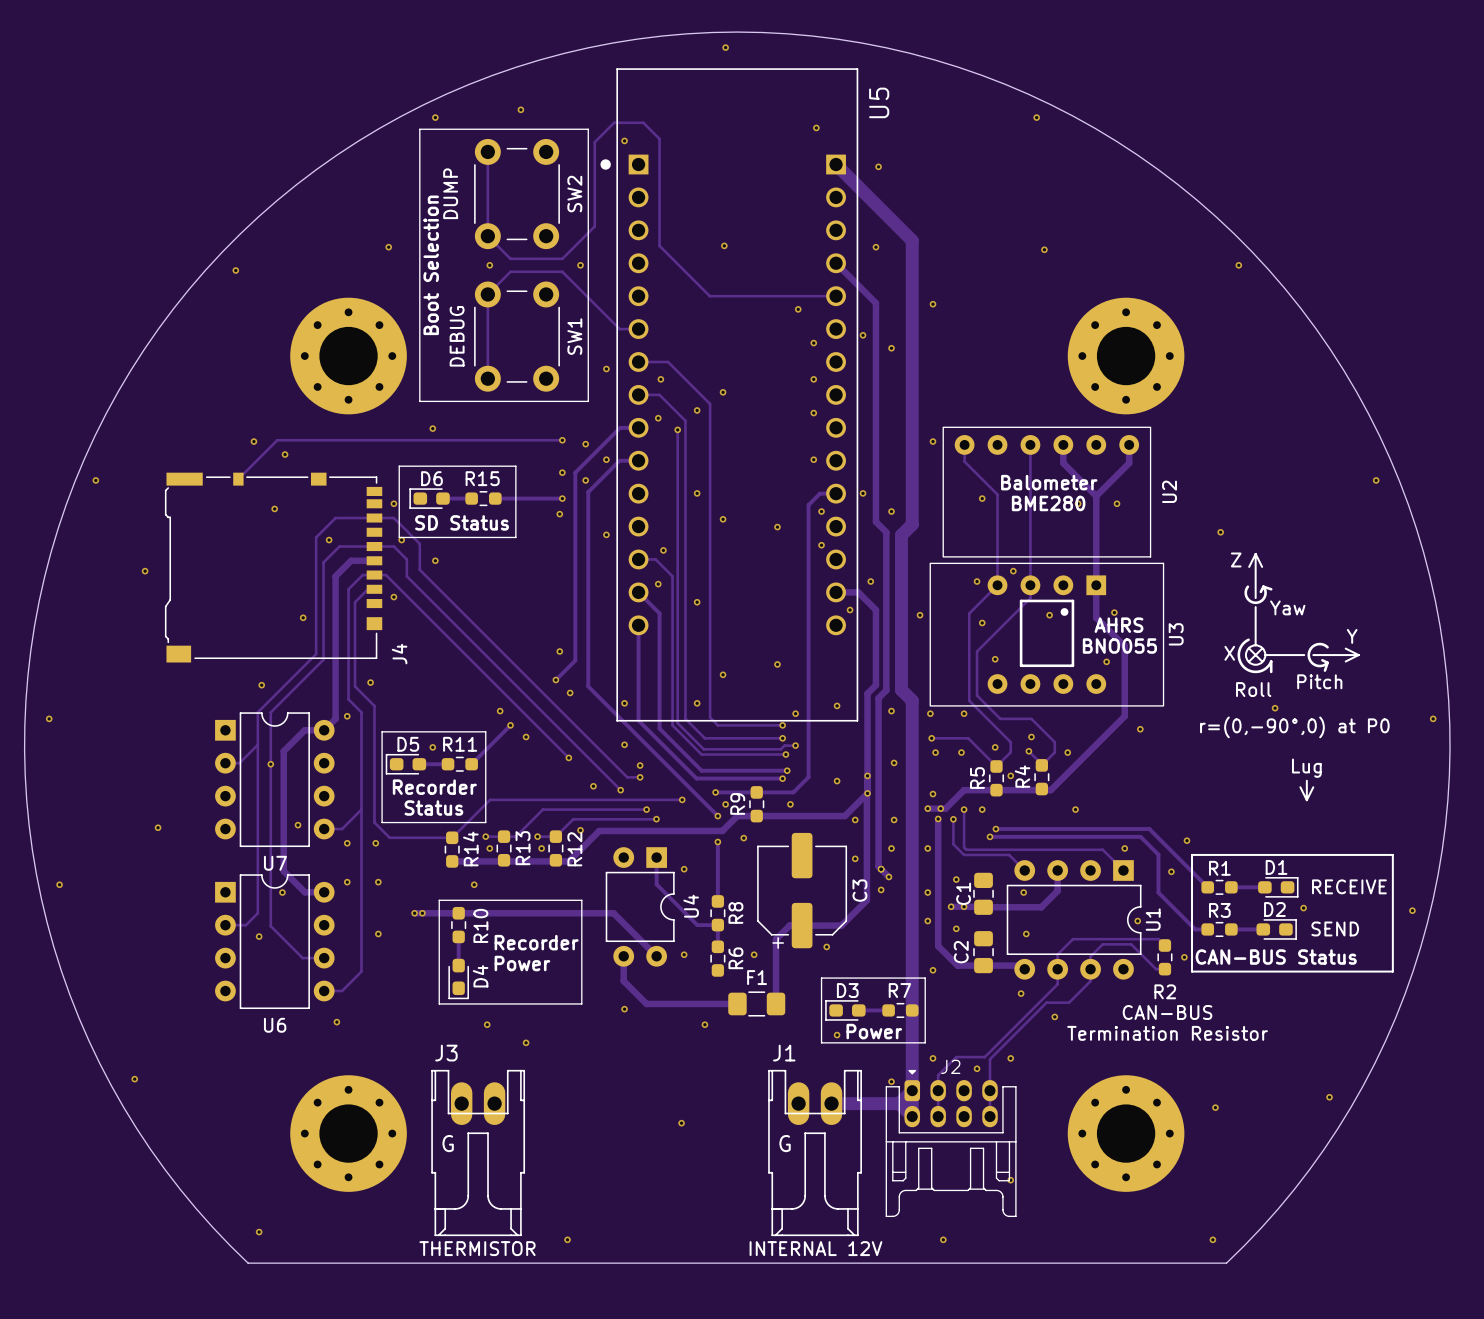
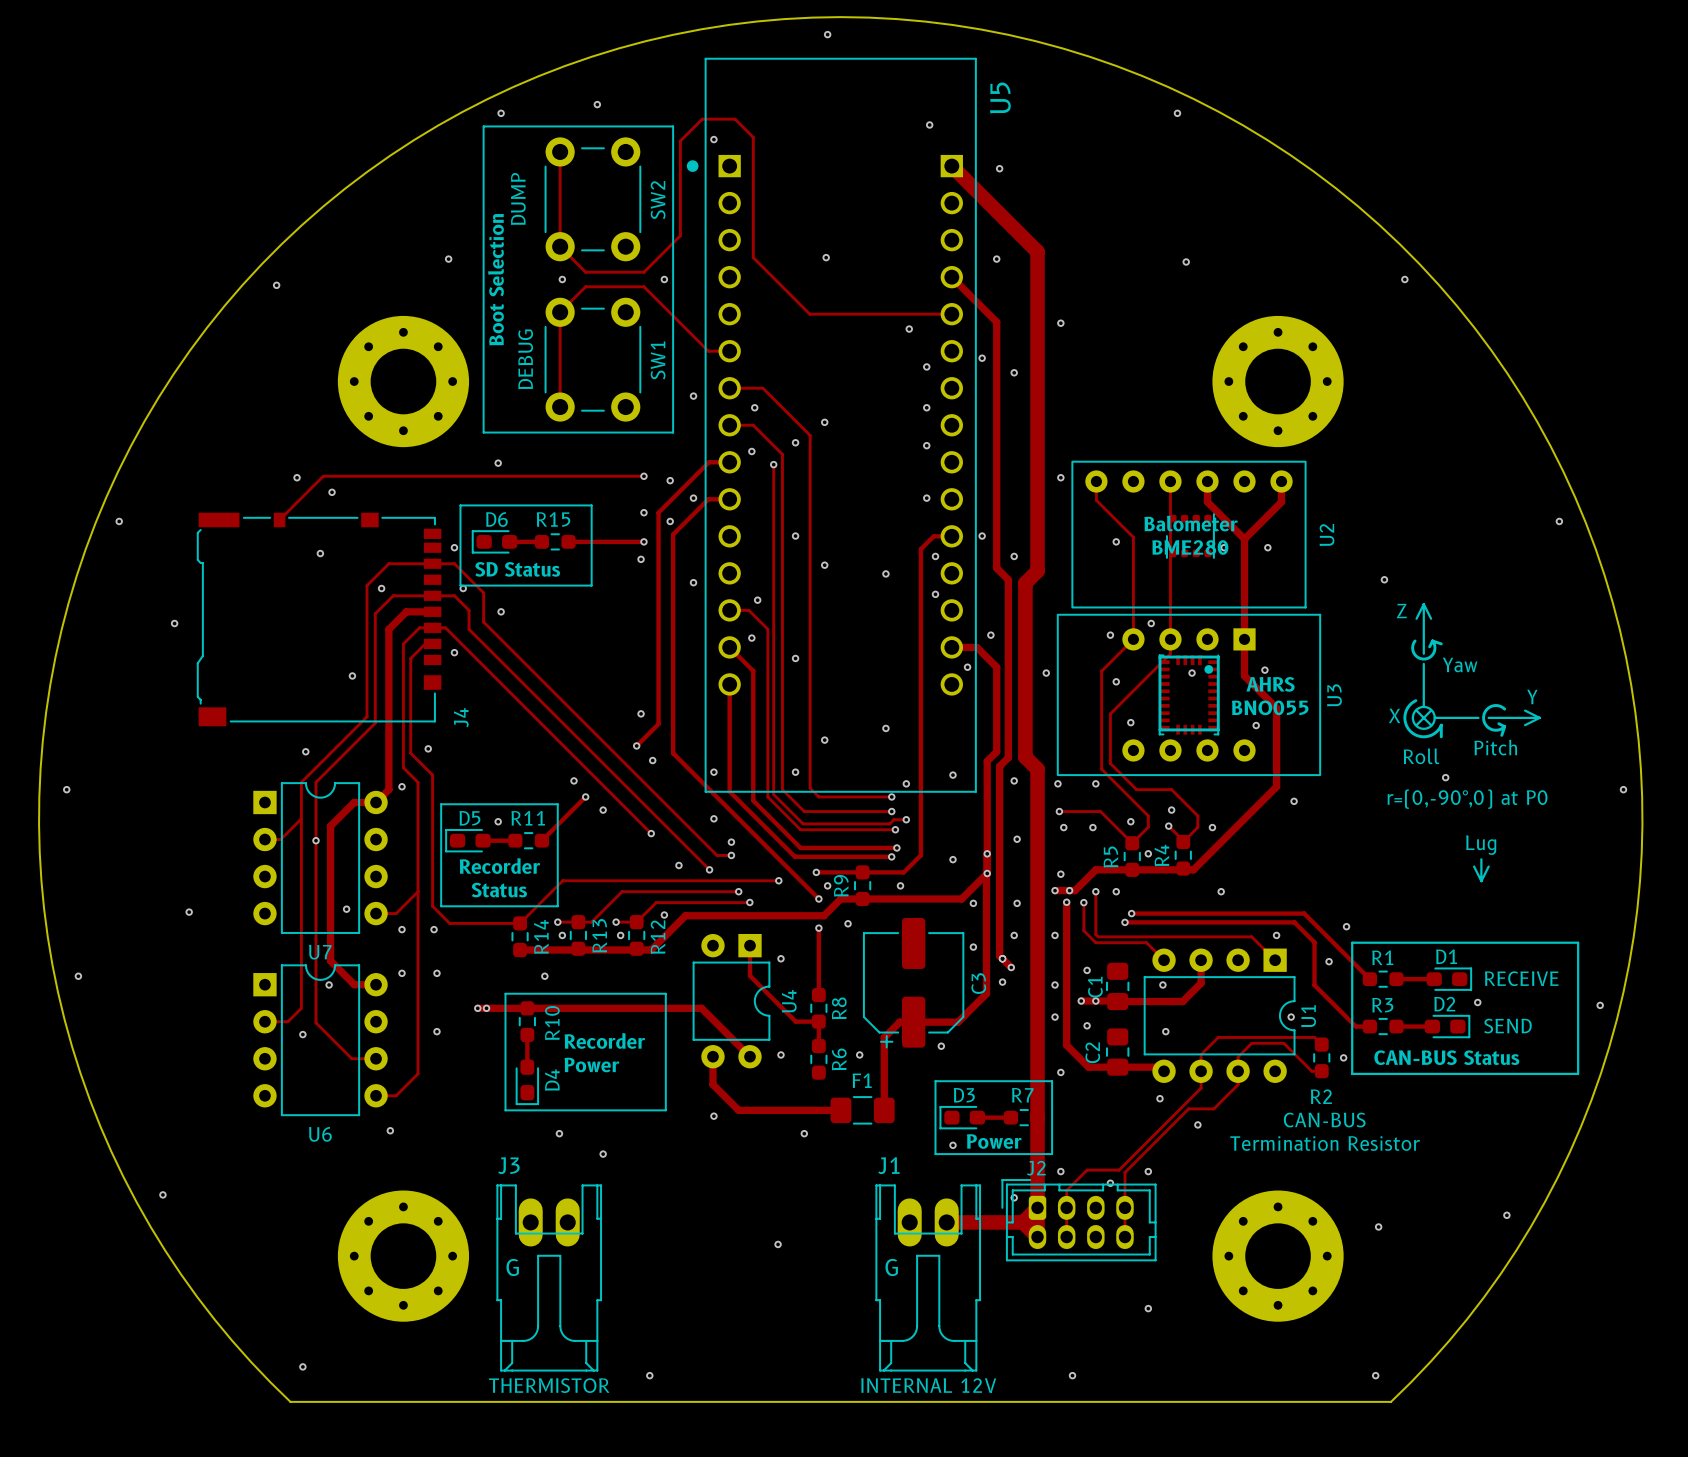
part: none -> (1190, 536)
part: none -> (1188, 694)
J2 name position: J2 (950, 1066) -> J2 (1036, 1168)
J2 footprint: [885, 1069, 1017, 1218] -> [1001, 1179, 1157, 1262]

